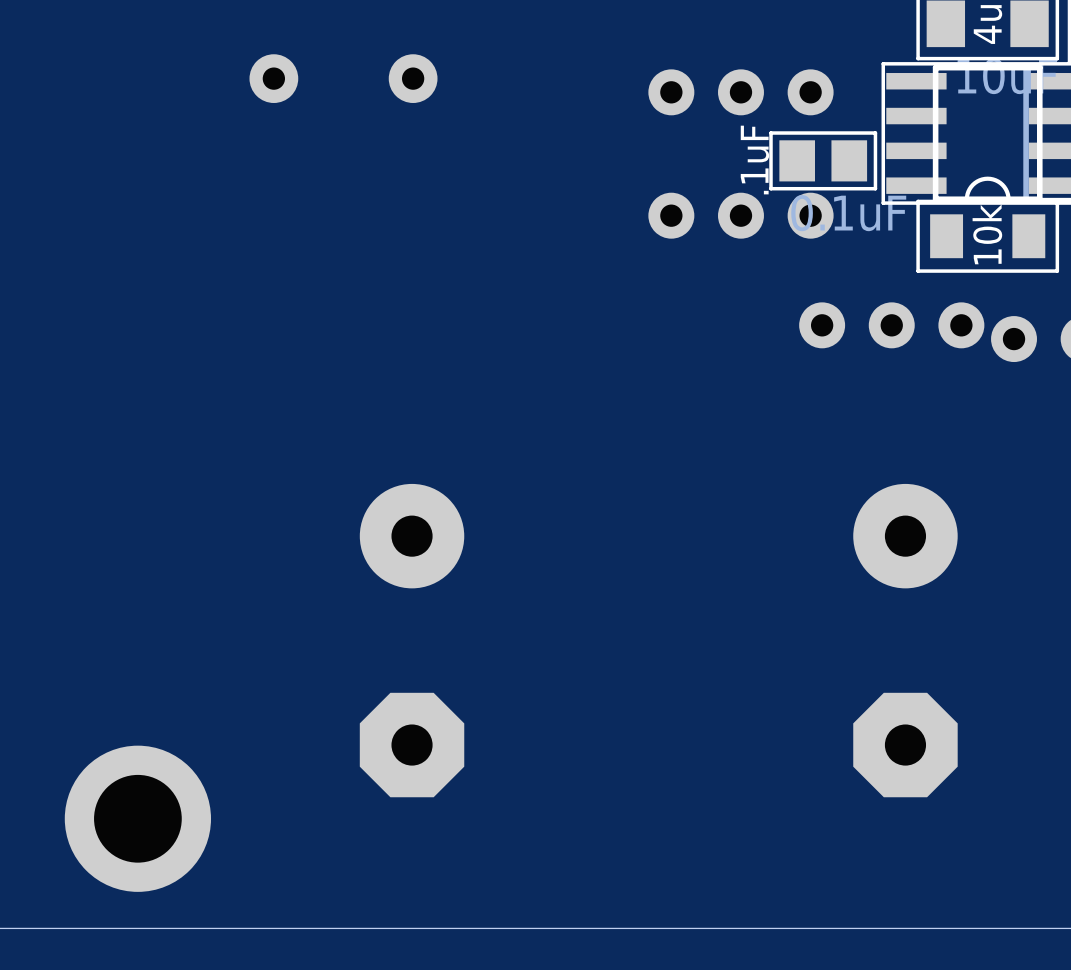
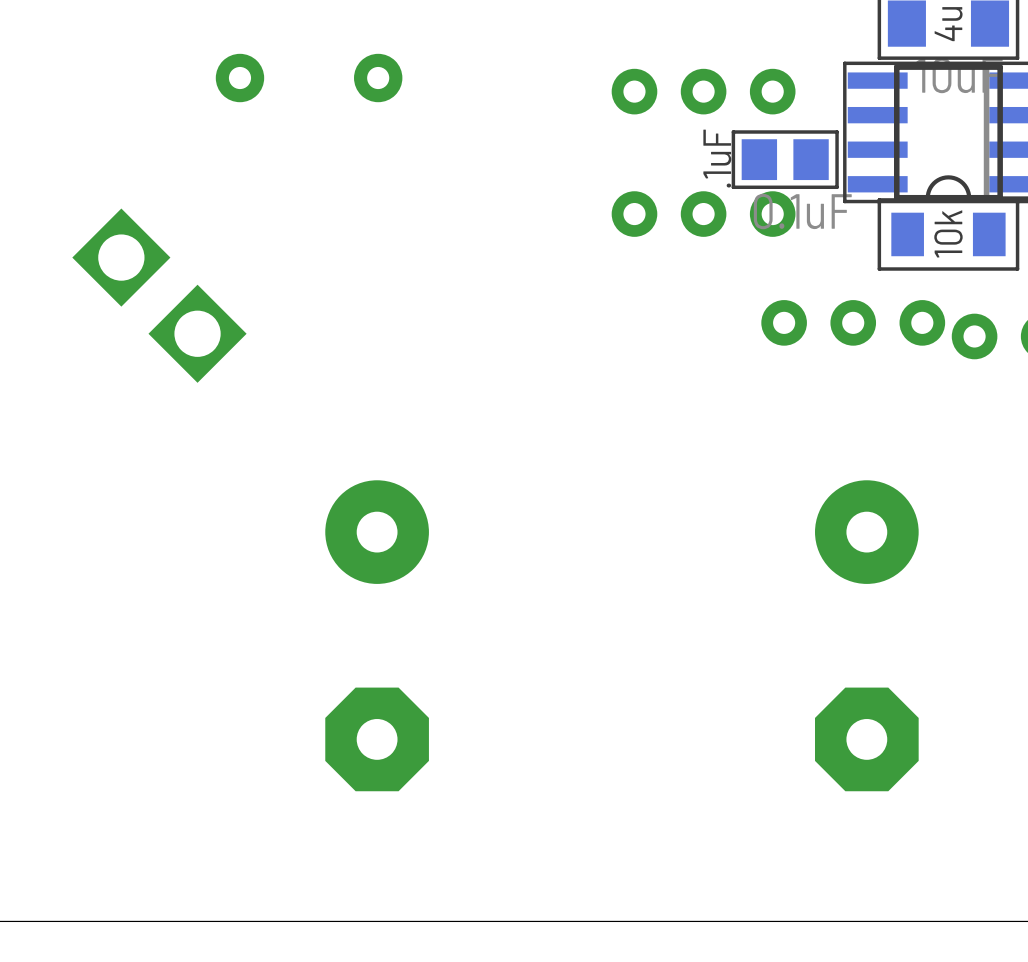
part: none -> (159, 295)
part: (137, 818) -> none

